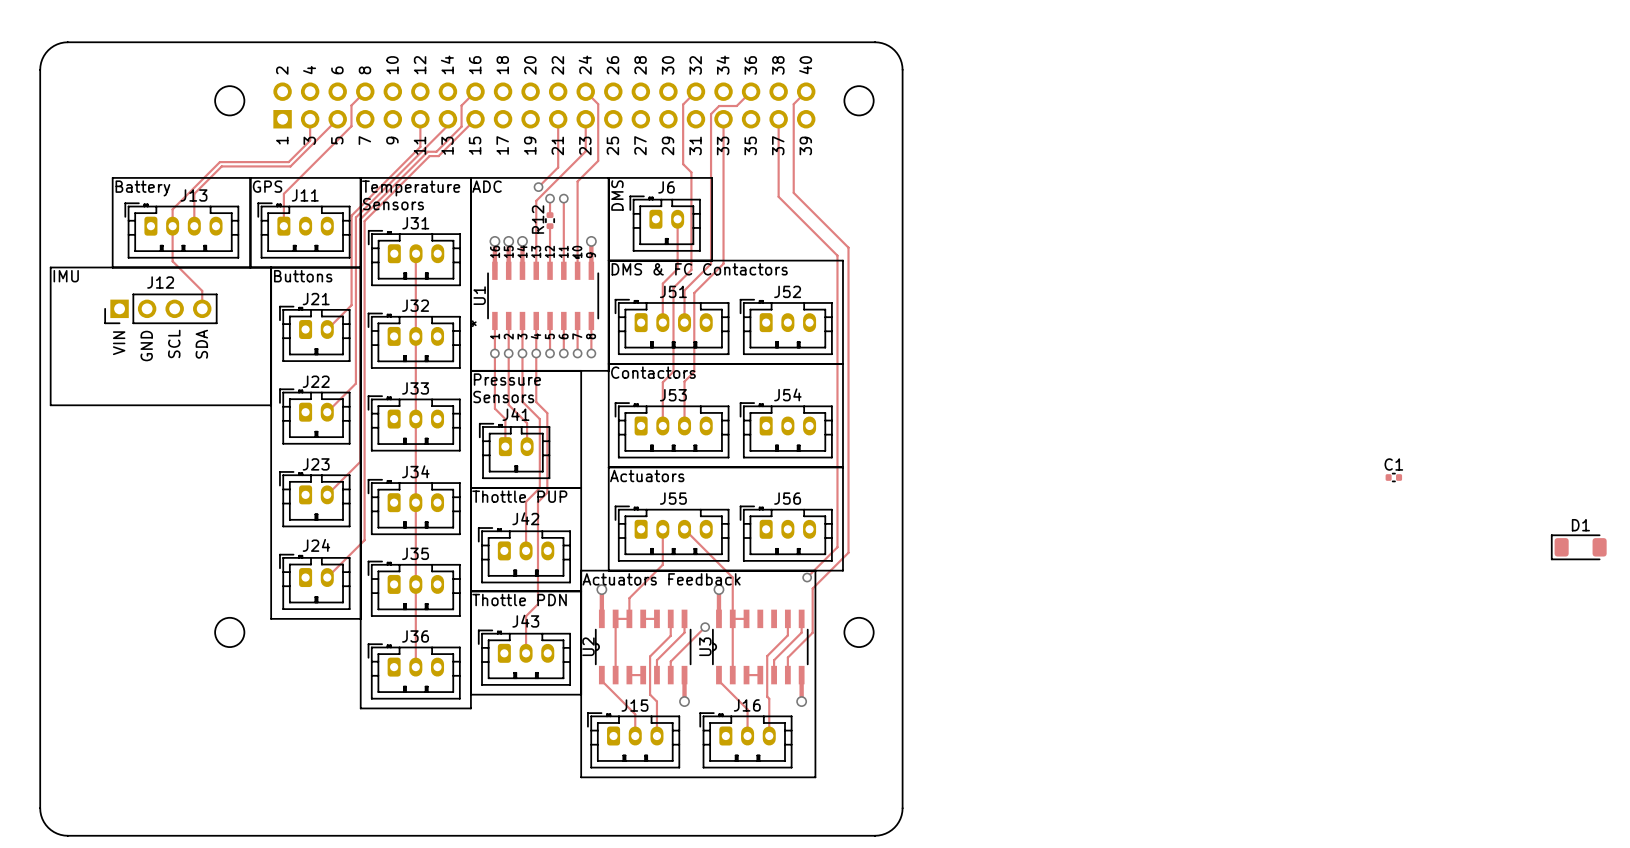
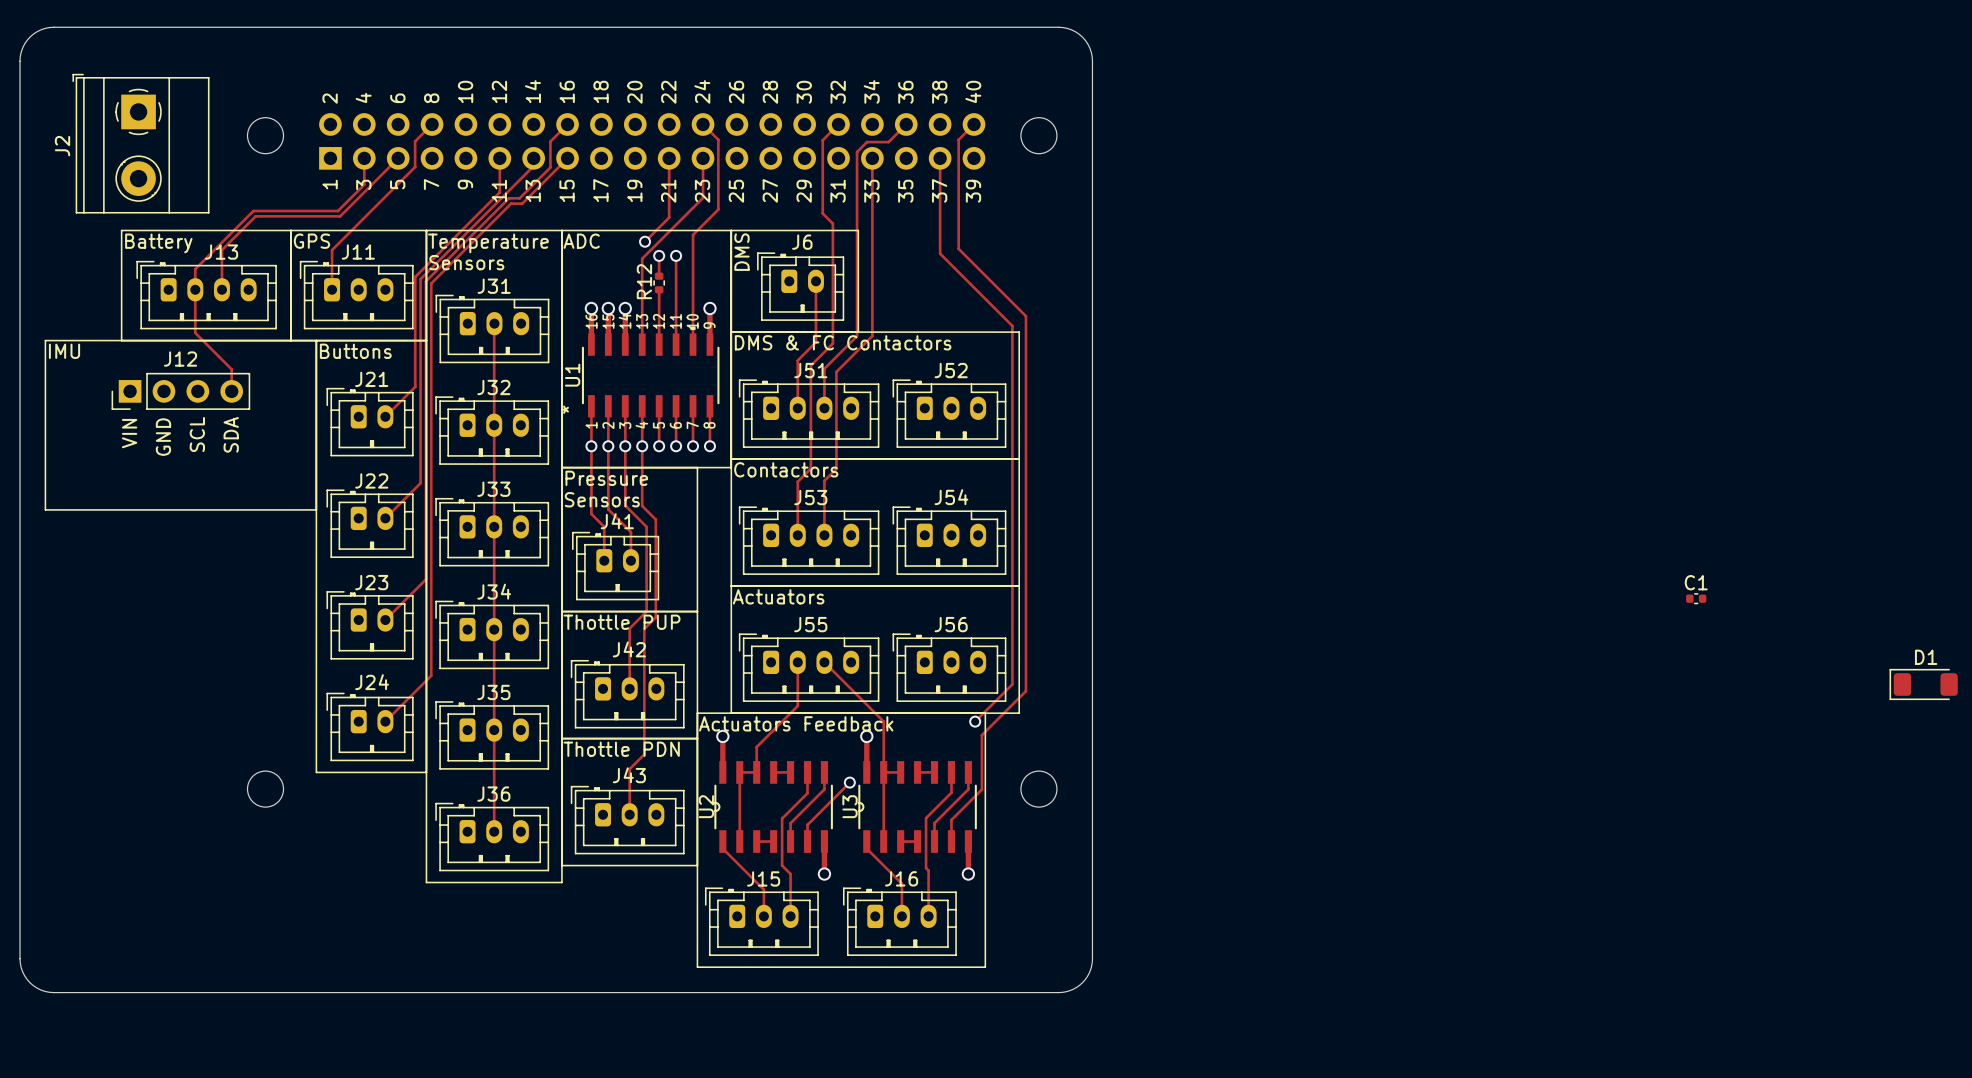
board edge: (902, 69) (900, 59) (894, 50) (885, 44) (875, 42) (67, 42) (50, 47) (42, 59) (40, 69) (40, 808) (42, 818) (48, 827) (57, 833) (67, 835) (875, 835) (891, 830) (900, 818) (902, 808) (902, 770) -> (1092, 97) (1092, 61) (1089, 48) (1079, 34) (1067, 28) (1058, 27) (53, 27) (42, 29) (29, 37) (21, 49) (20, 61) (20, 958) (22, 971) (33, 985) (45, 991) (53, 992) (1058, 992) (1069, 990) (1082, 982) (1090, 969) (1092, 958)
J2: none -> (140, 143)
track: none -> (917, 772) (934, 772)

